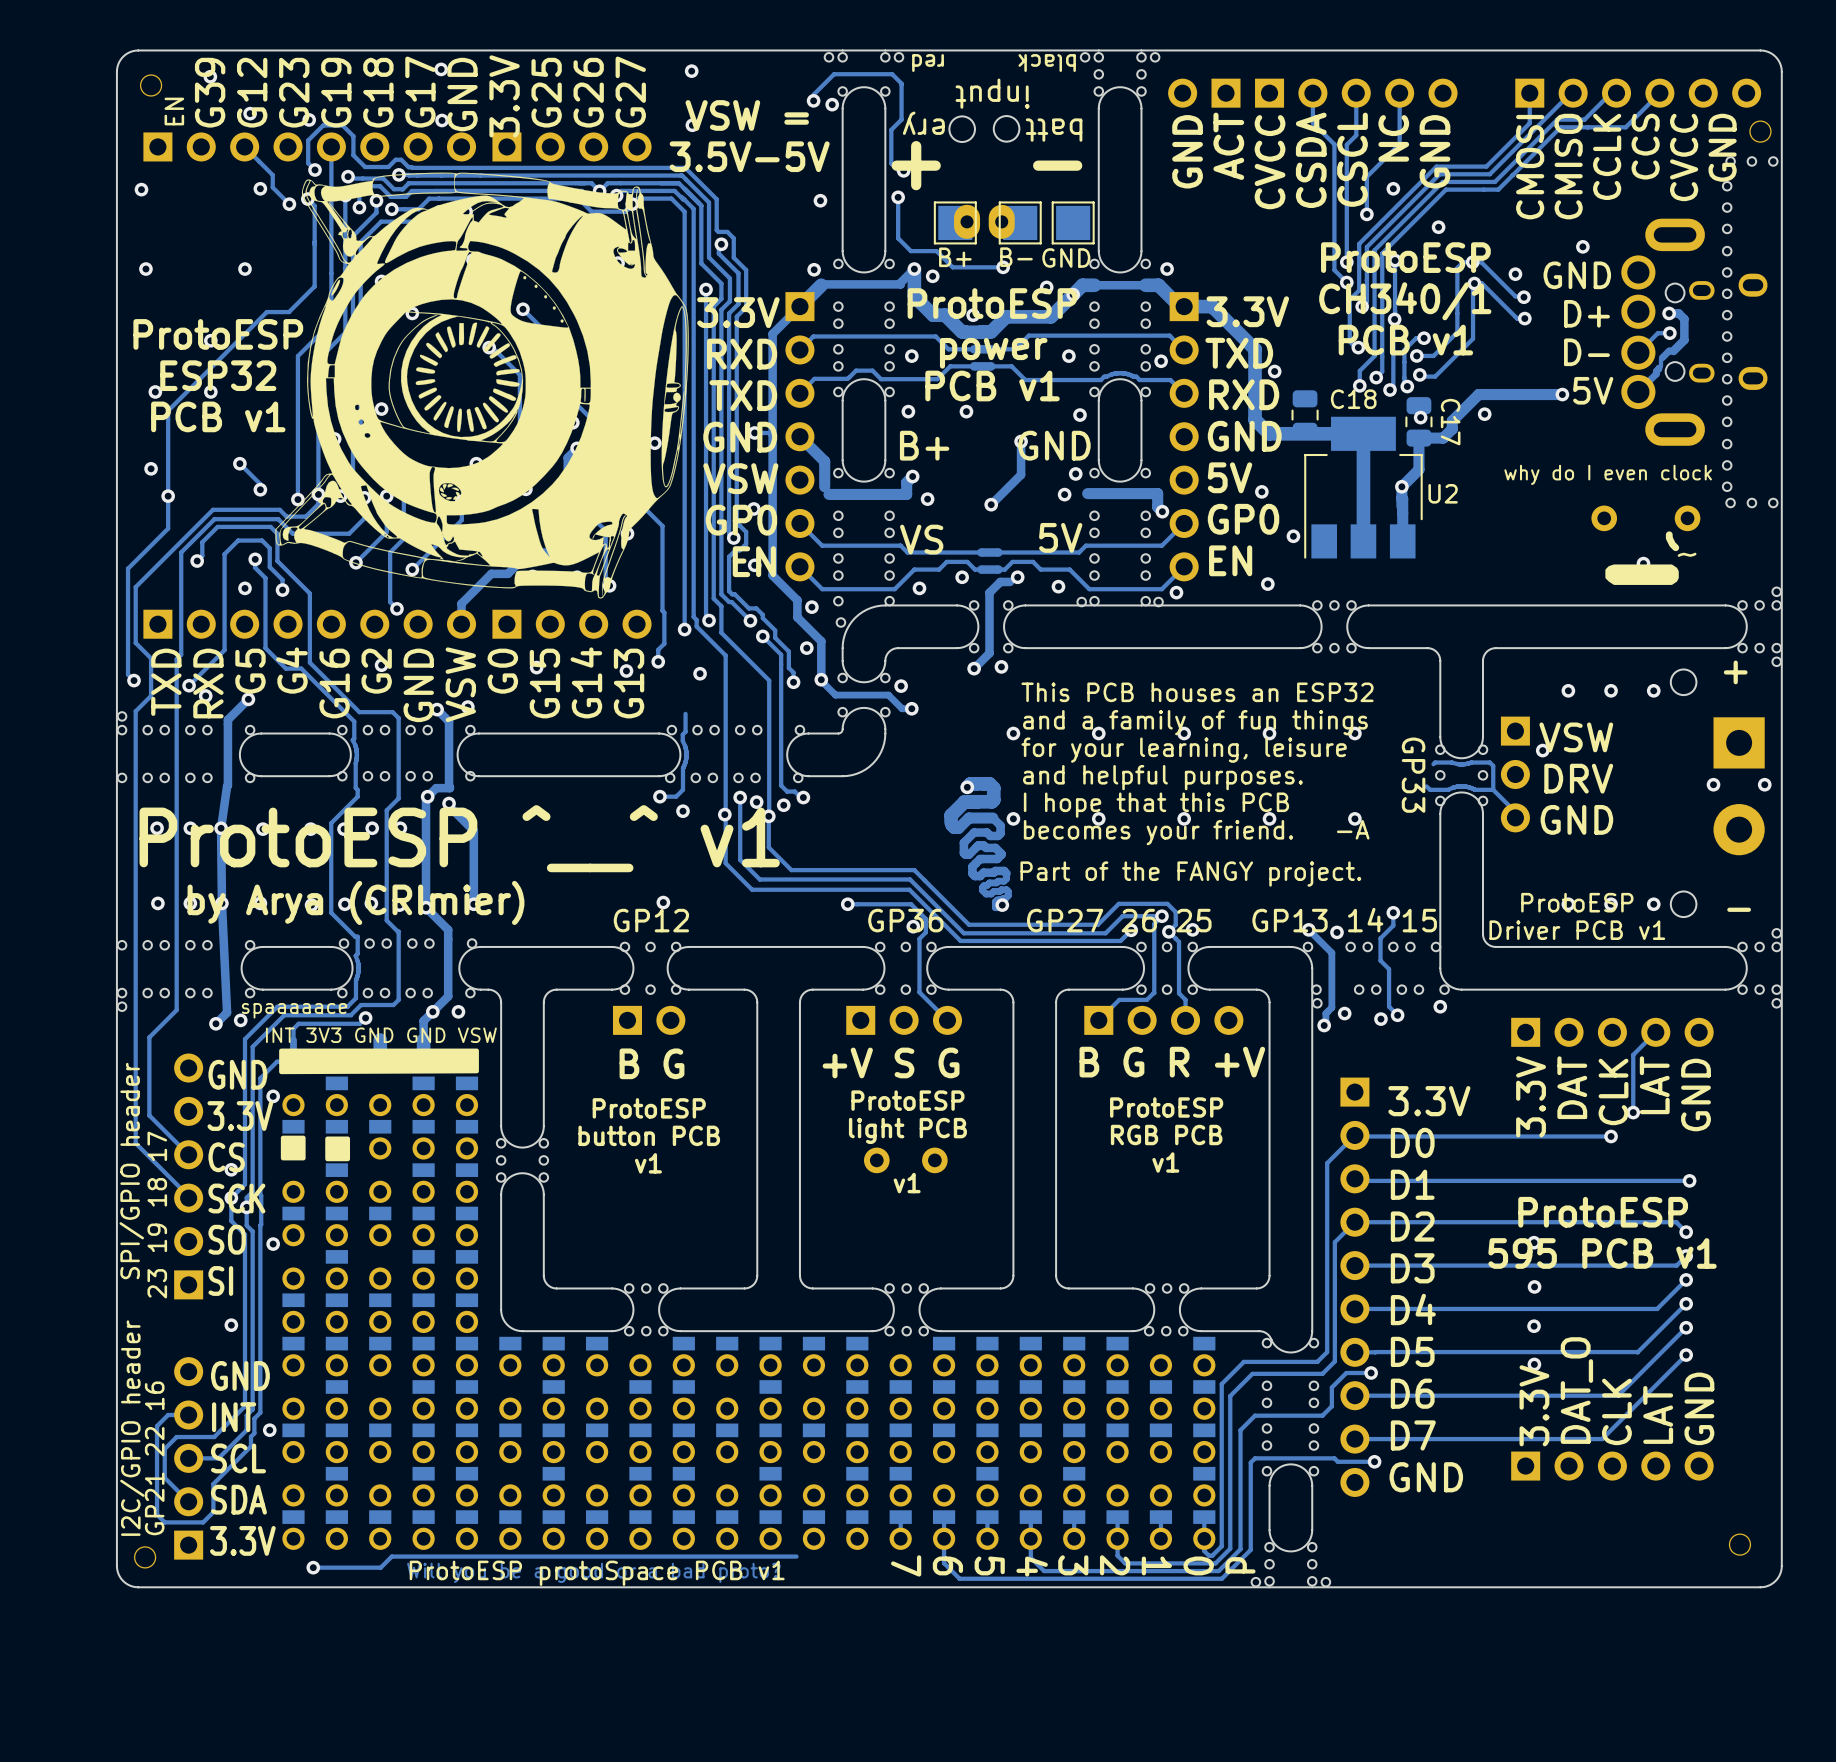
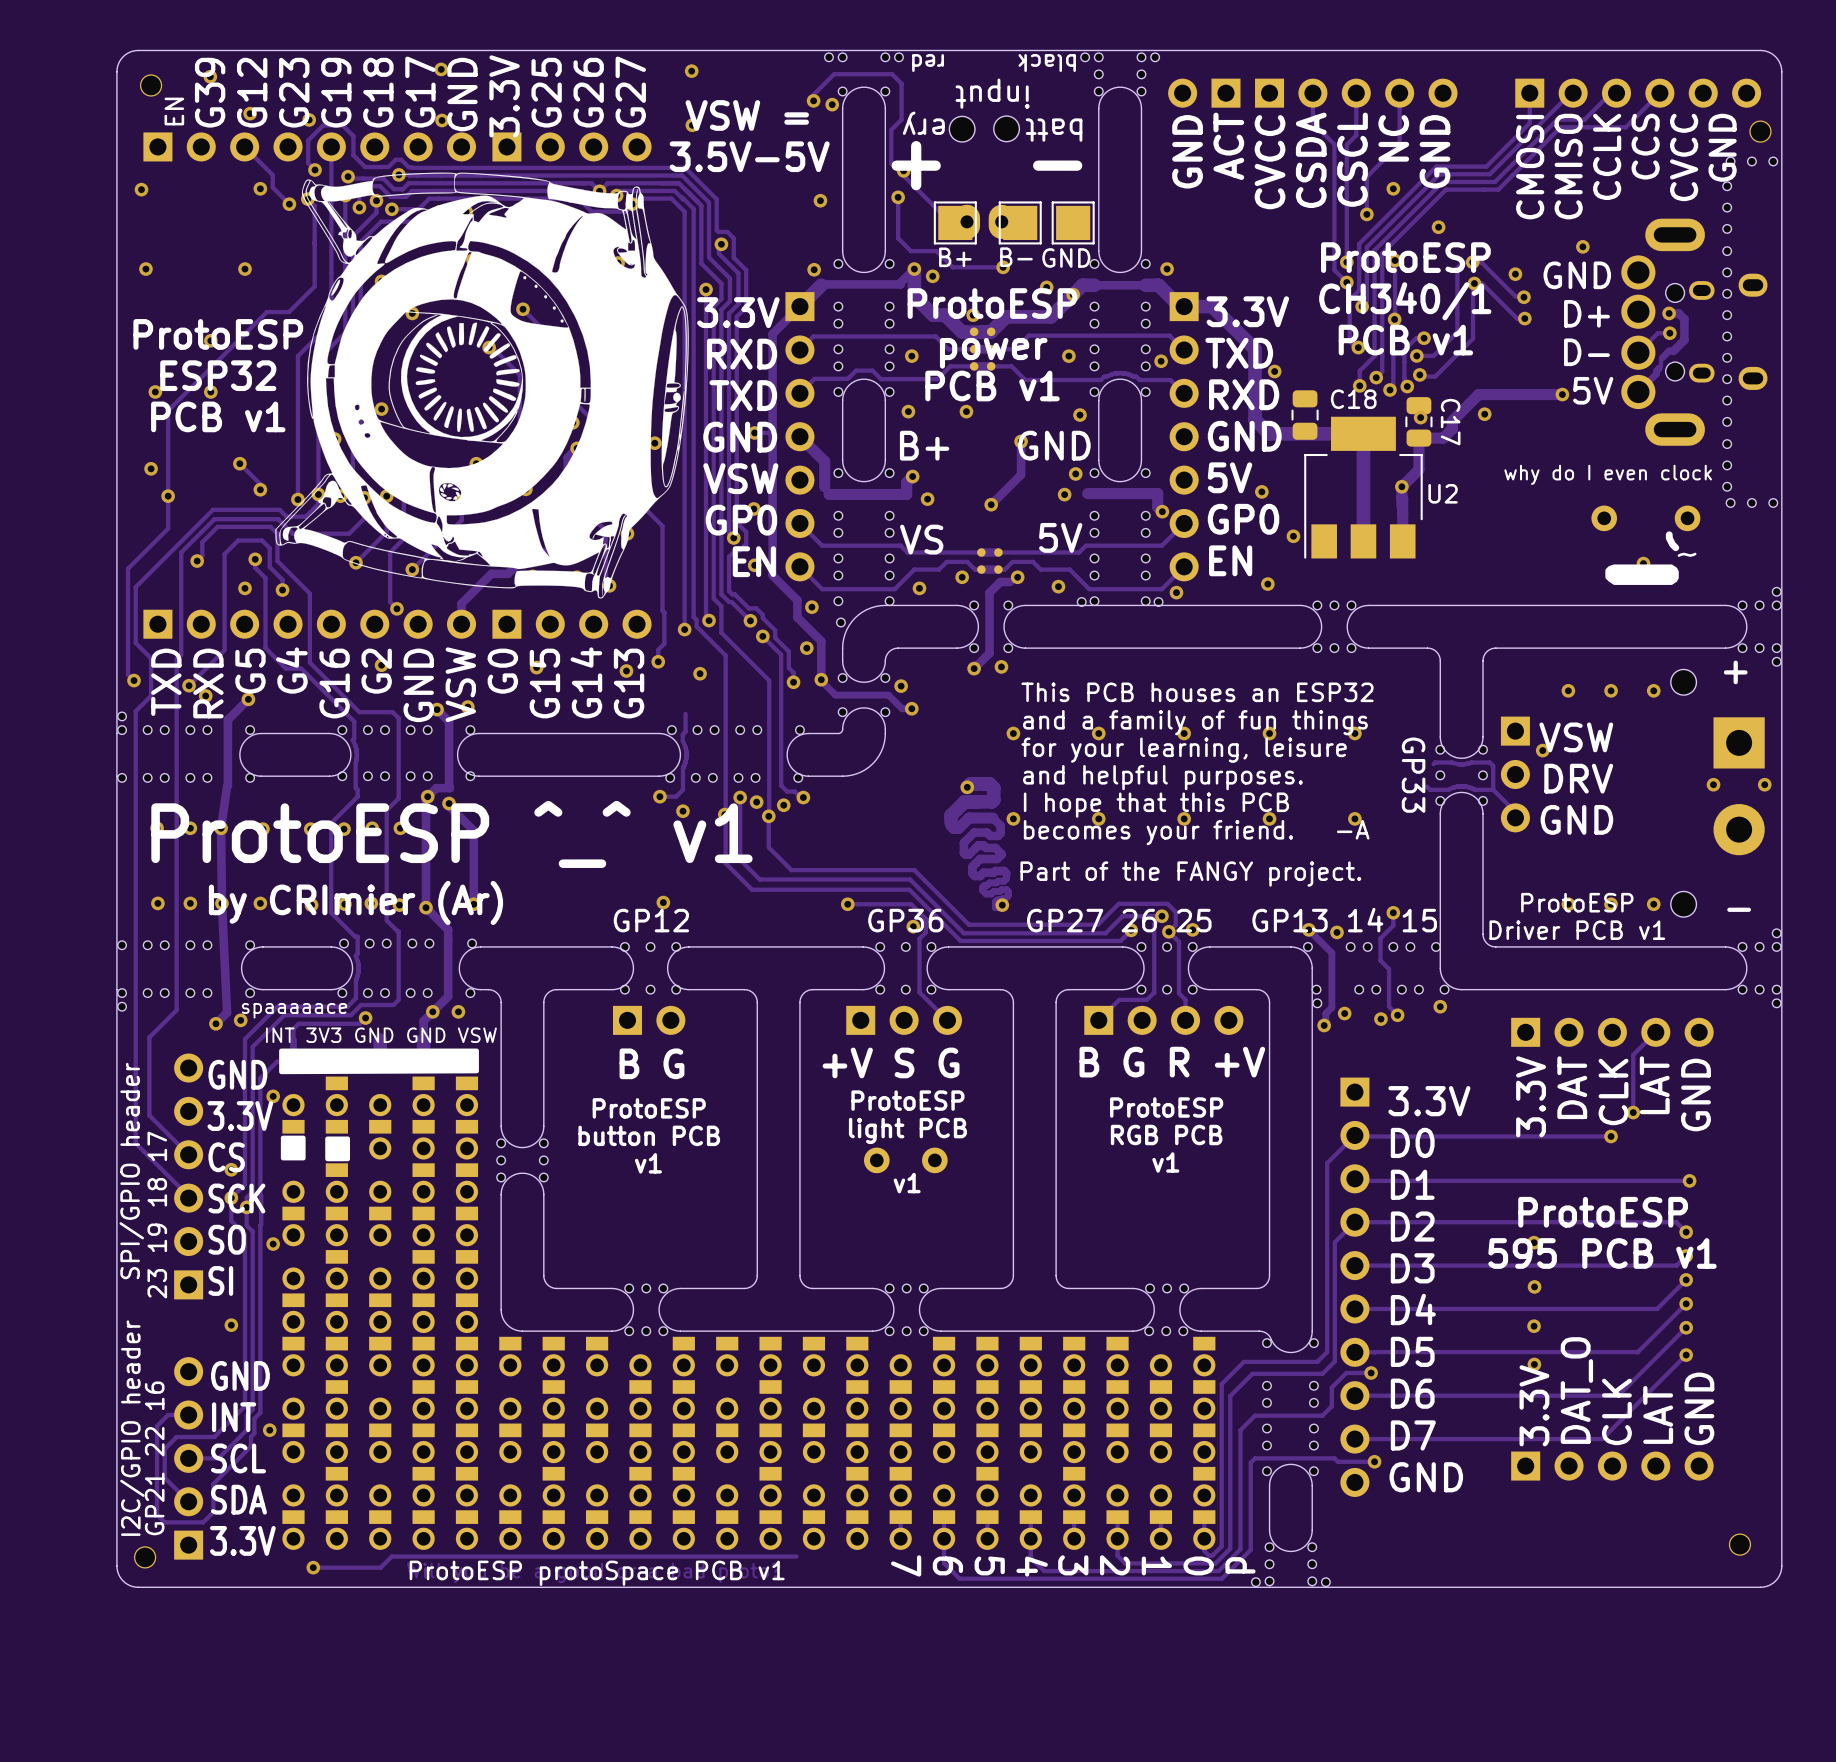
track: none -> (900, 172) (949, 221)
text: ProtoESP ^__^ v1 (459, 838) -> ProtoESP ^_^ v1 (451, 834)
text: by Arya (CRImier) (355, 902) -> by CRImier (Ar) (355, 902)

